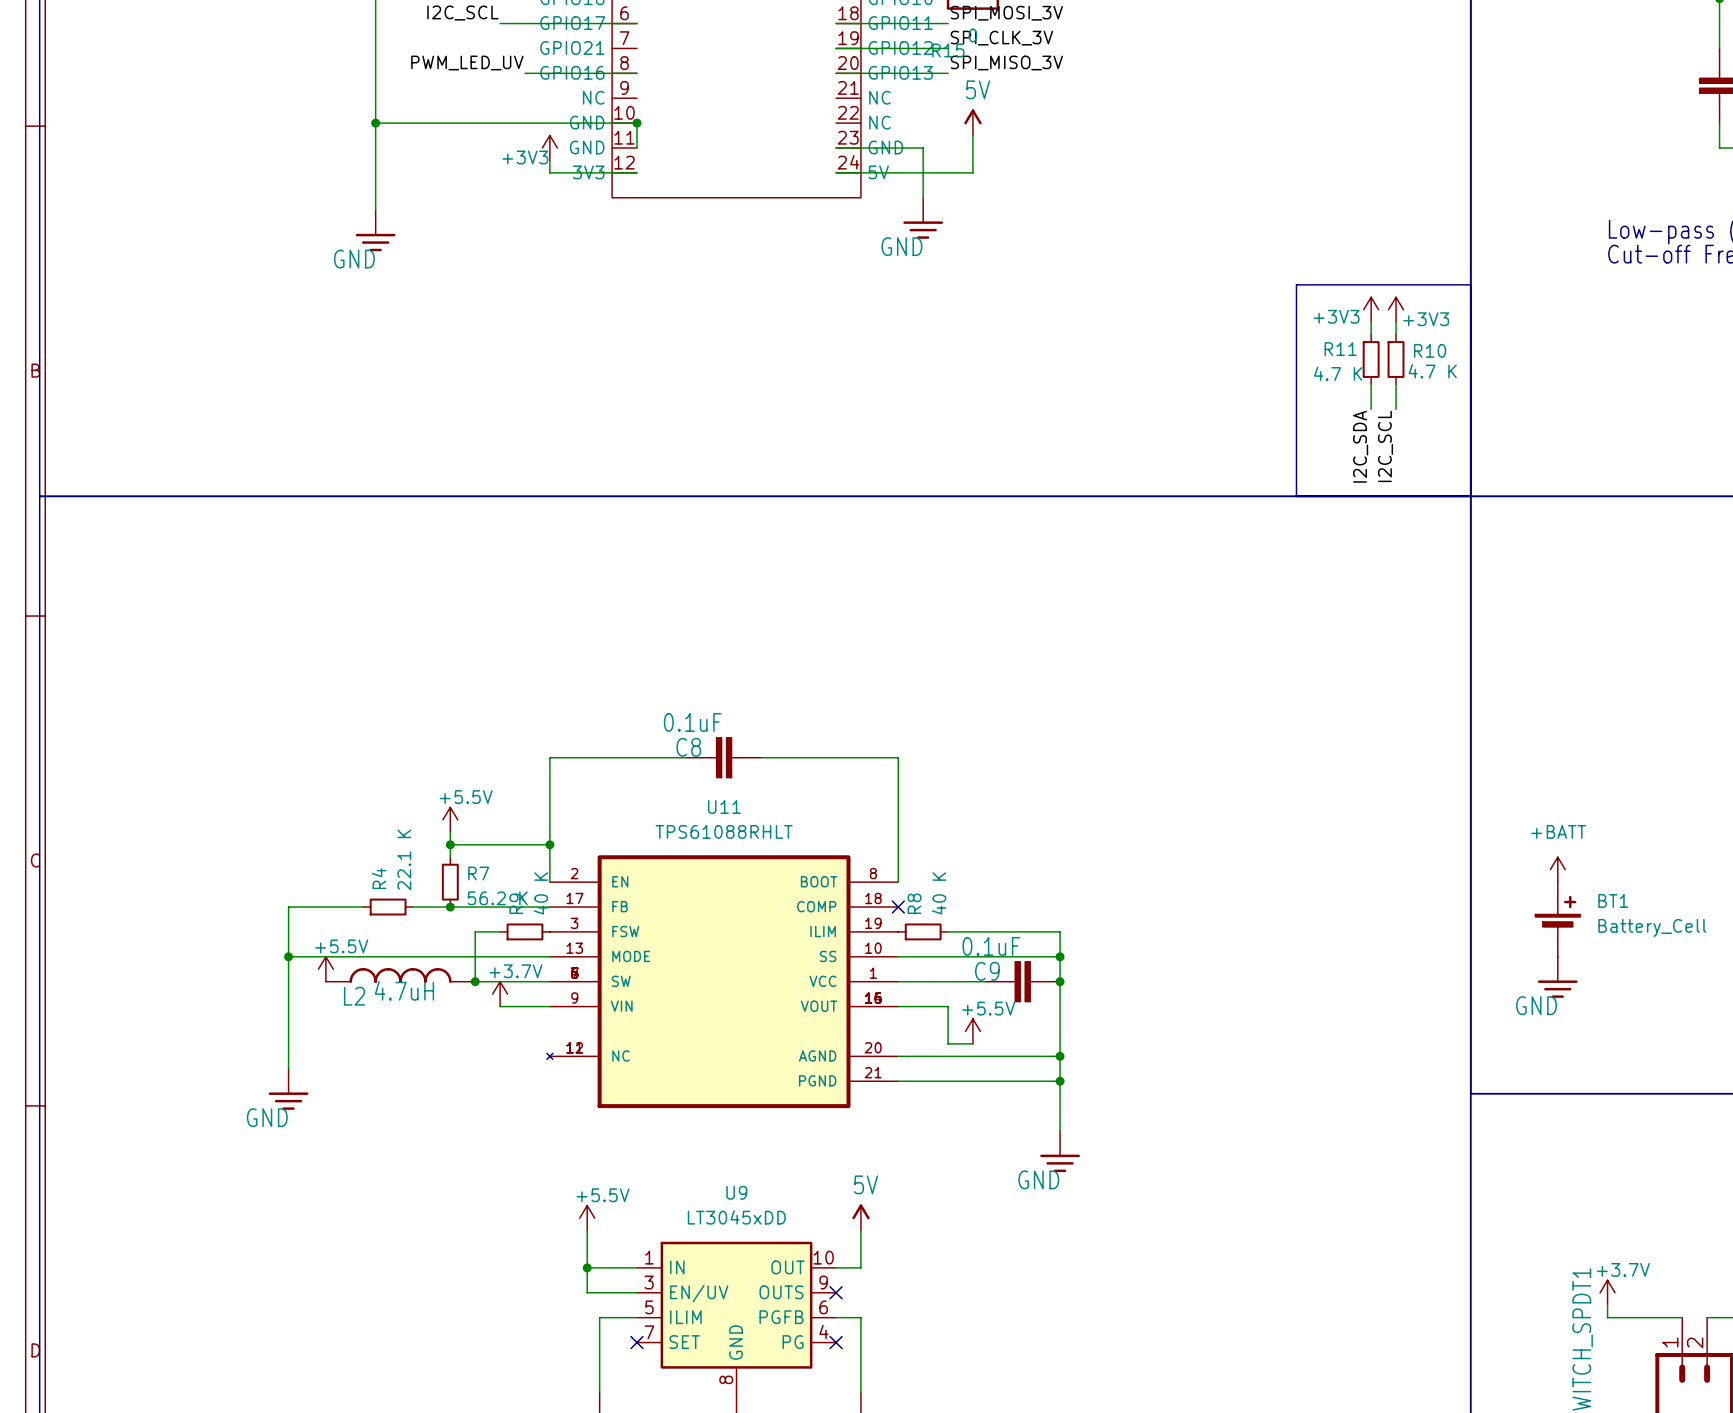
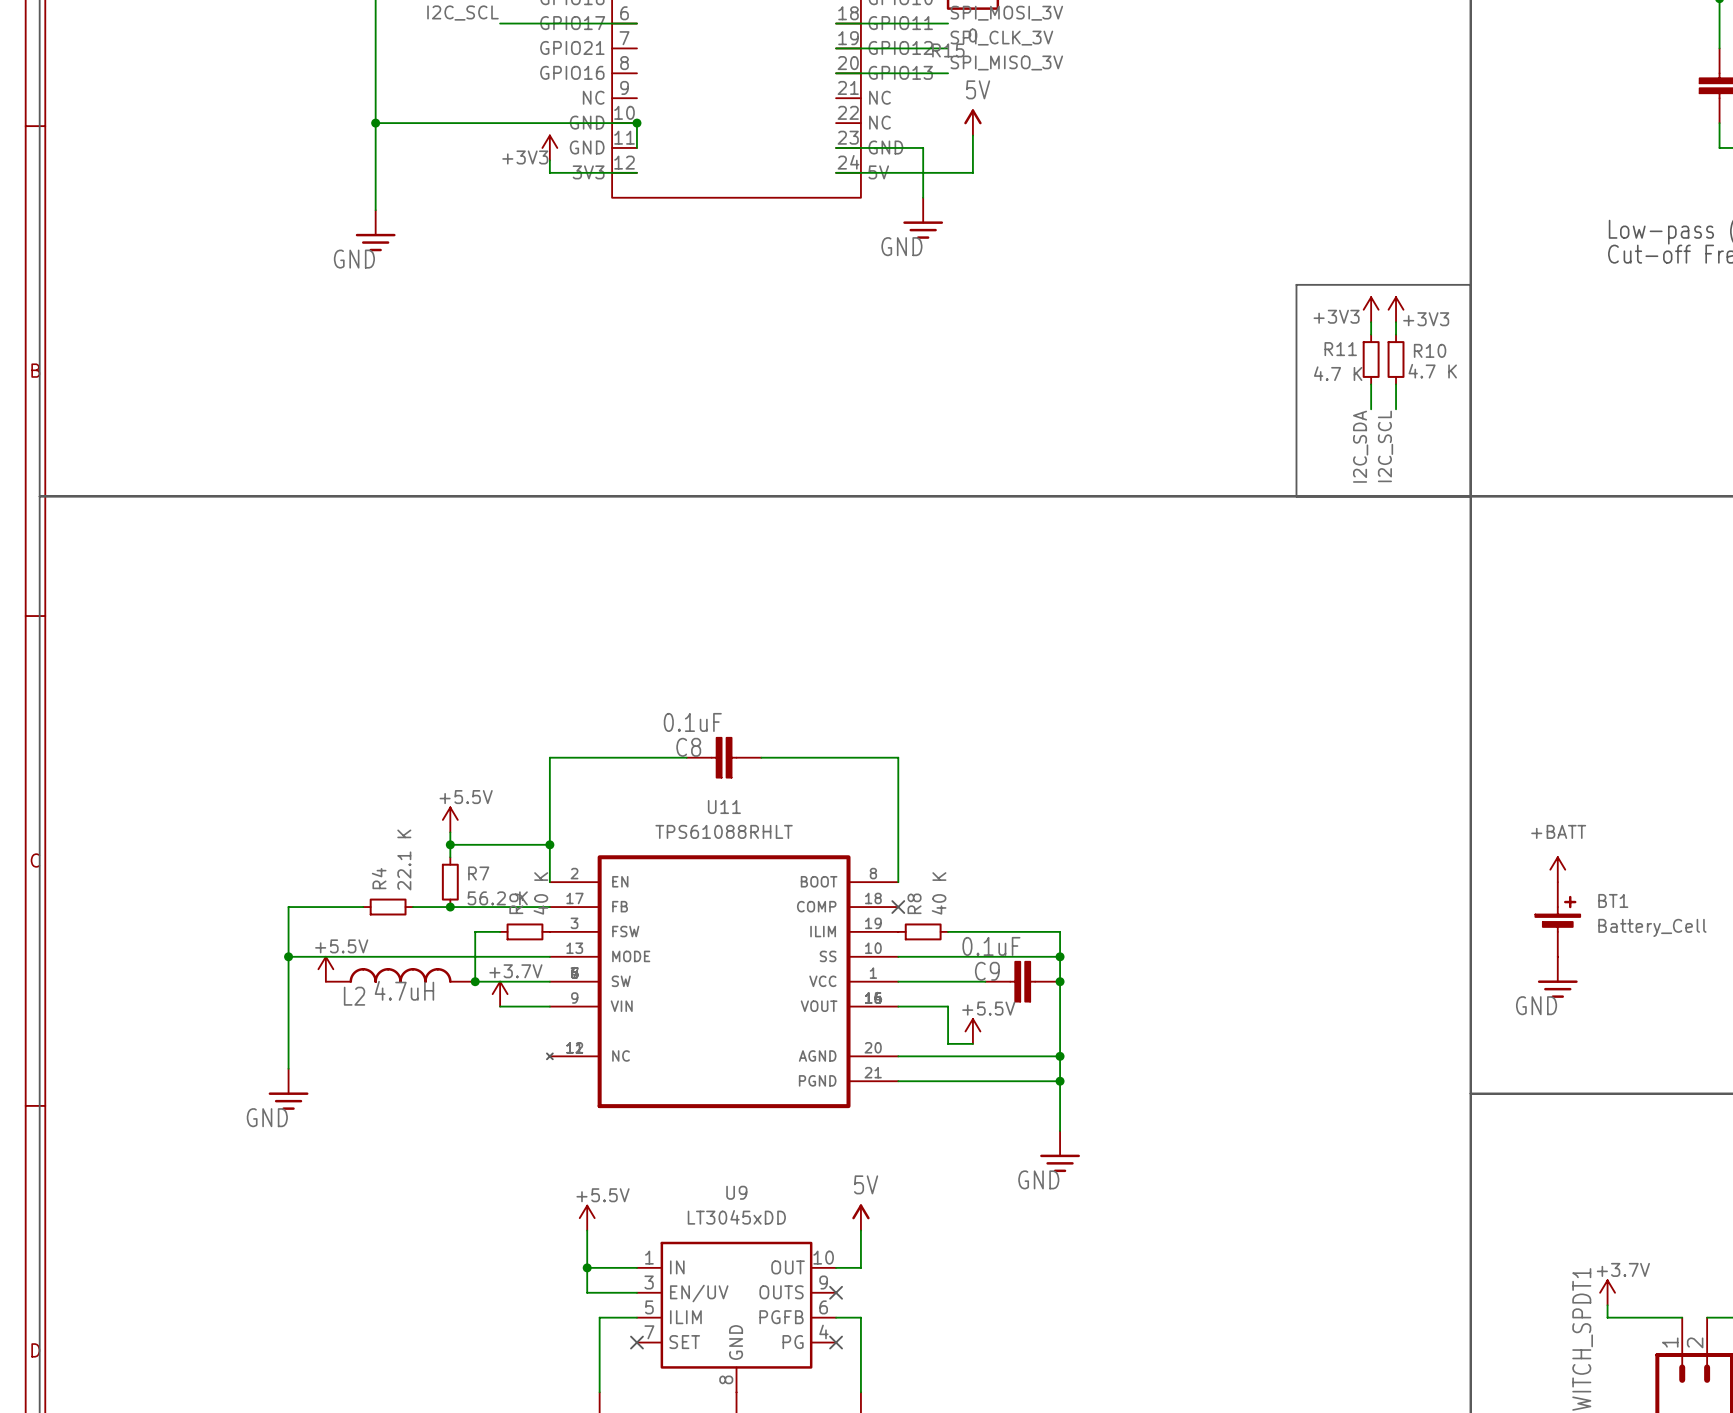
label: PWM_LED_UV (467, 62) -> none
wire: (524, 73) (636, 73) -> none

